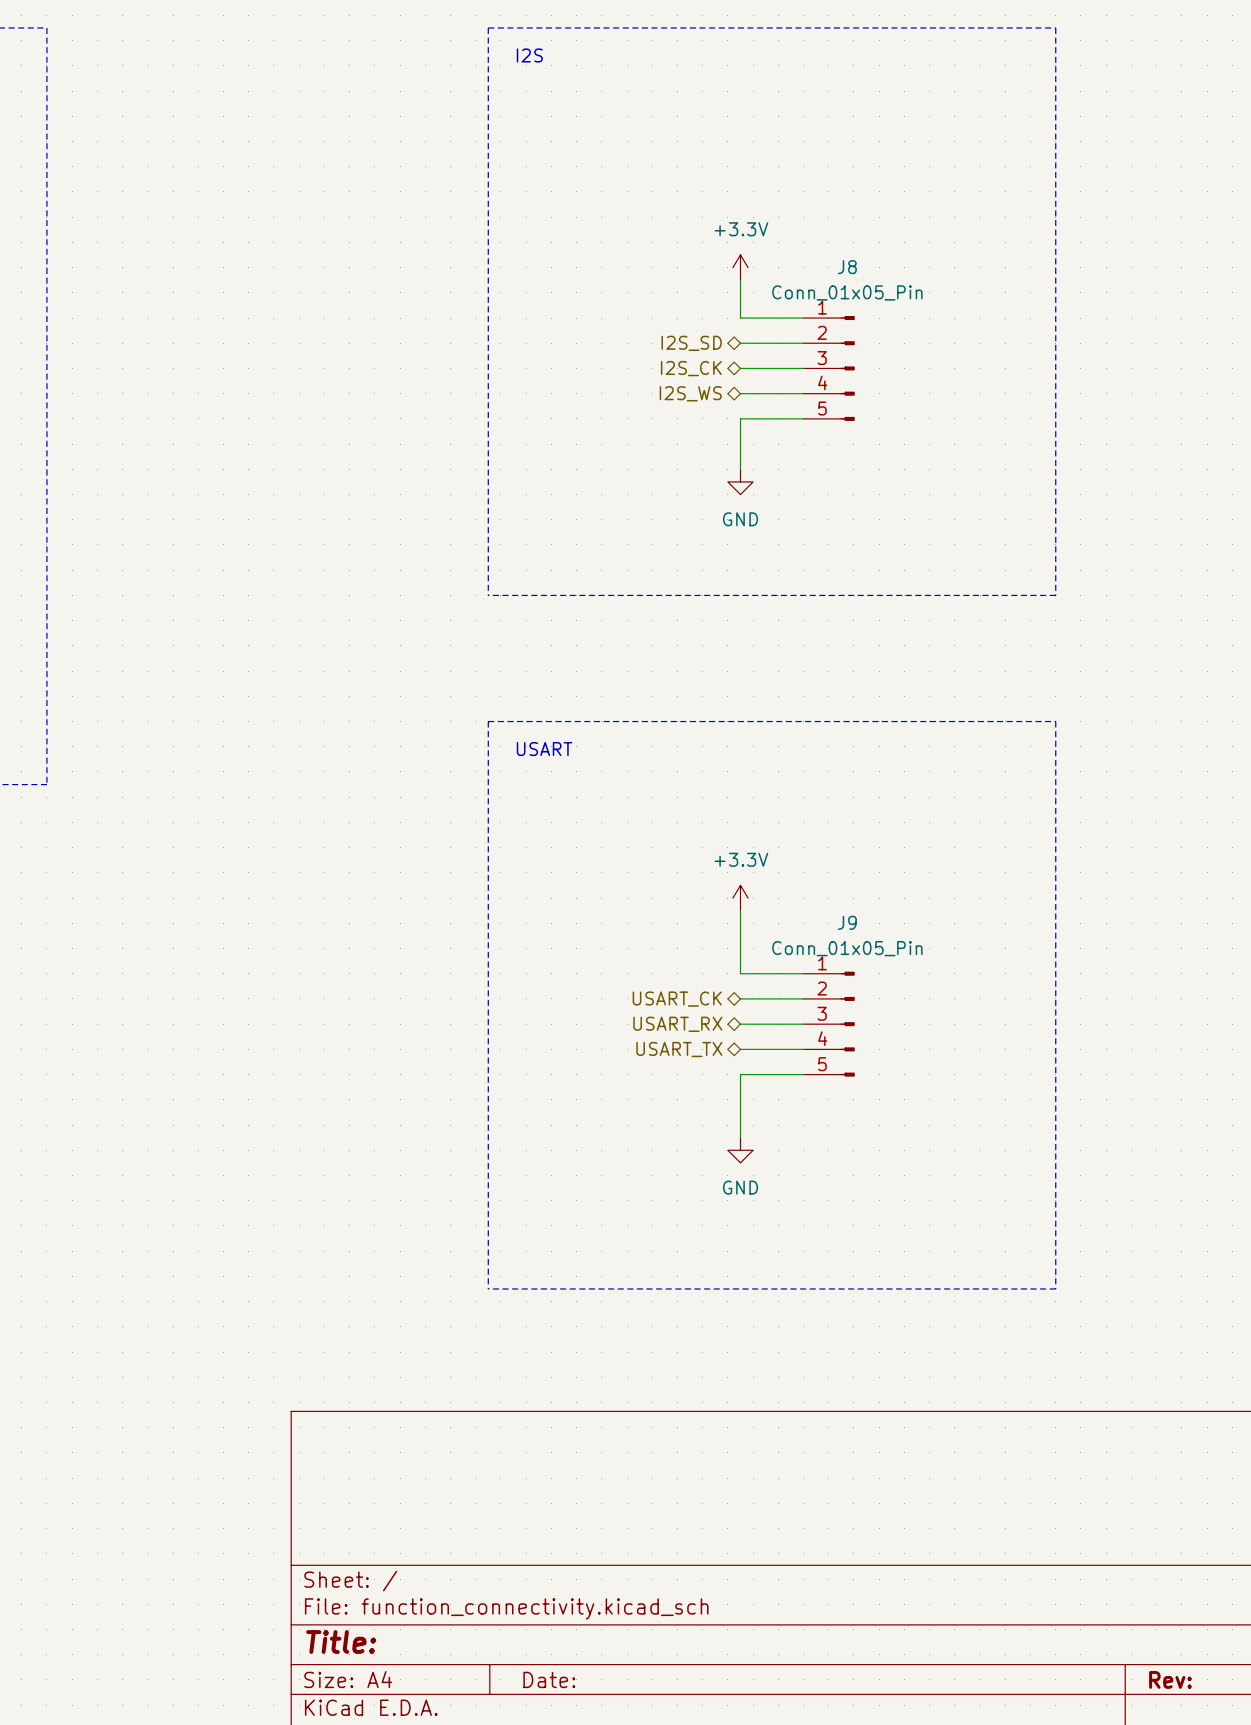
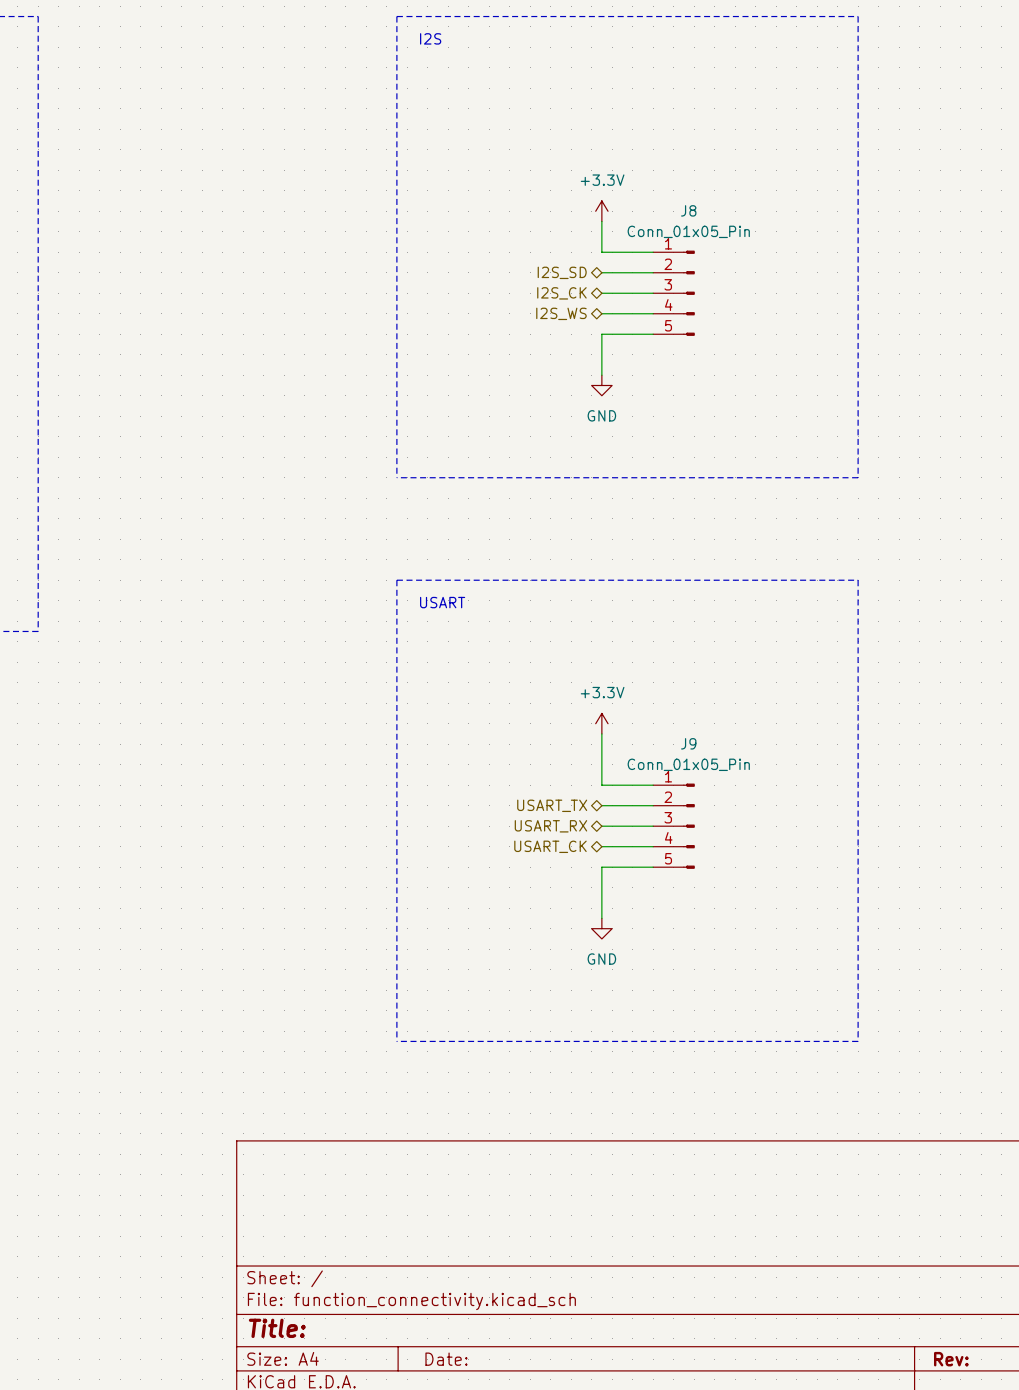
hierarchical label: USART_CK (677, 999) -> USART_TX (552, 805)
hierarchical label: USART_TX (679, 1049) -> USART_CK (550, 846)

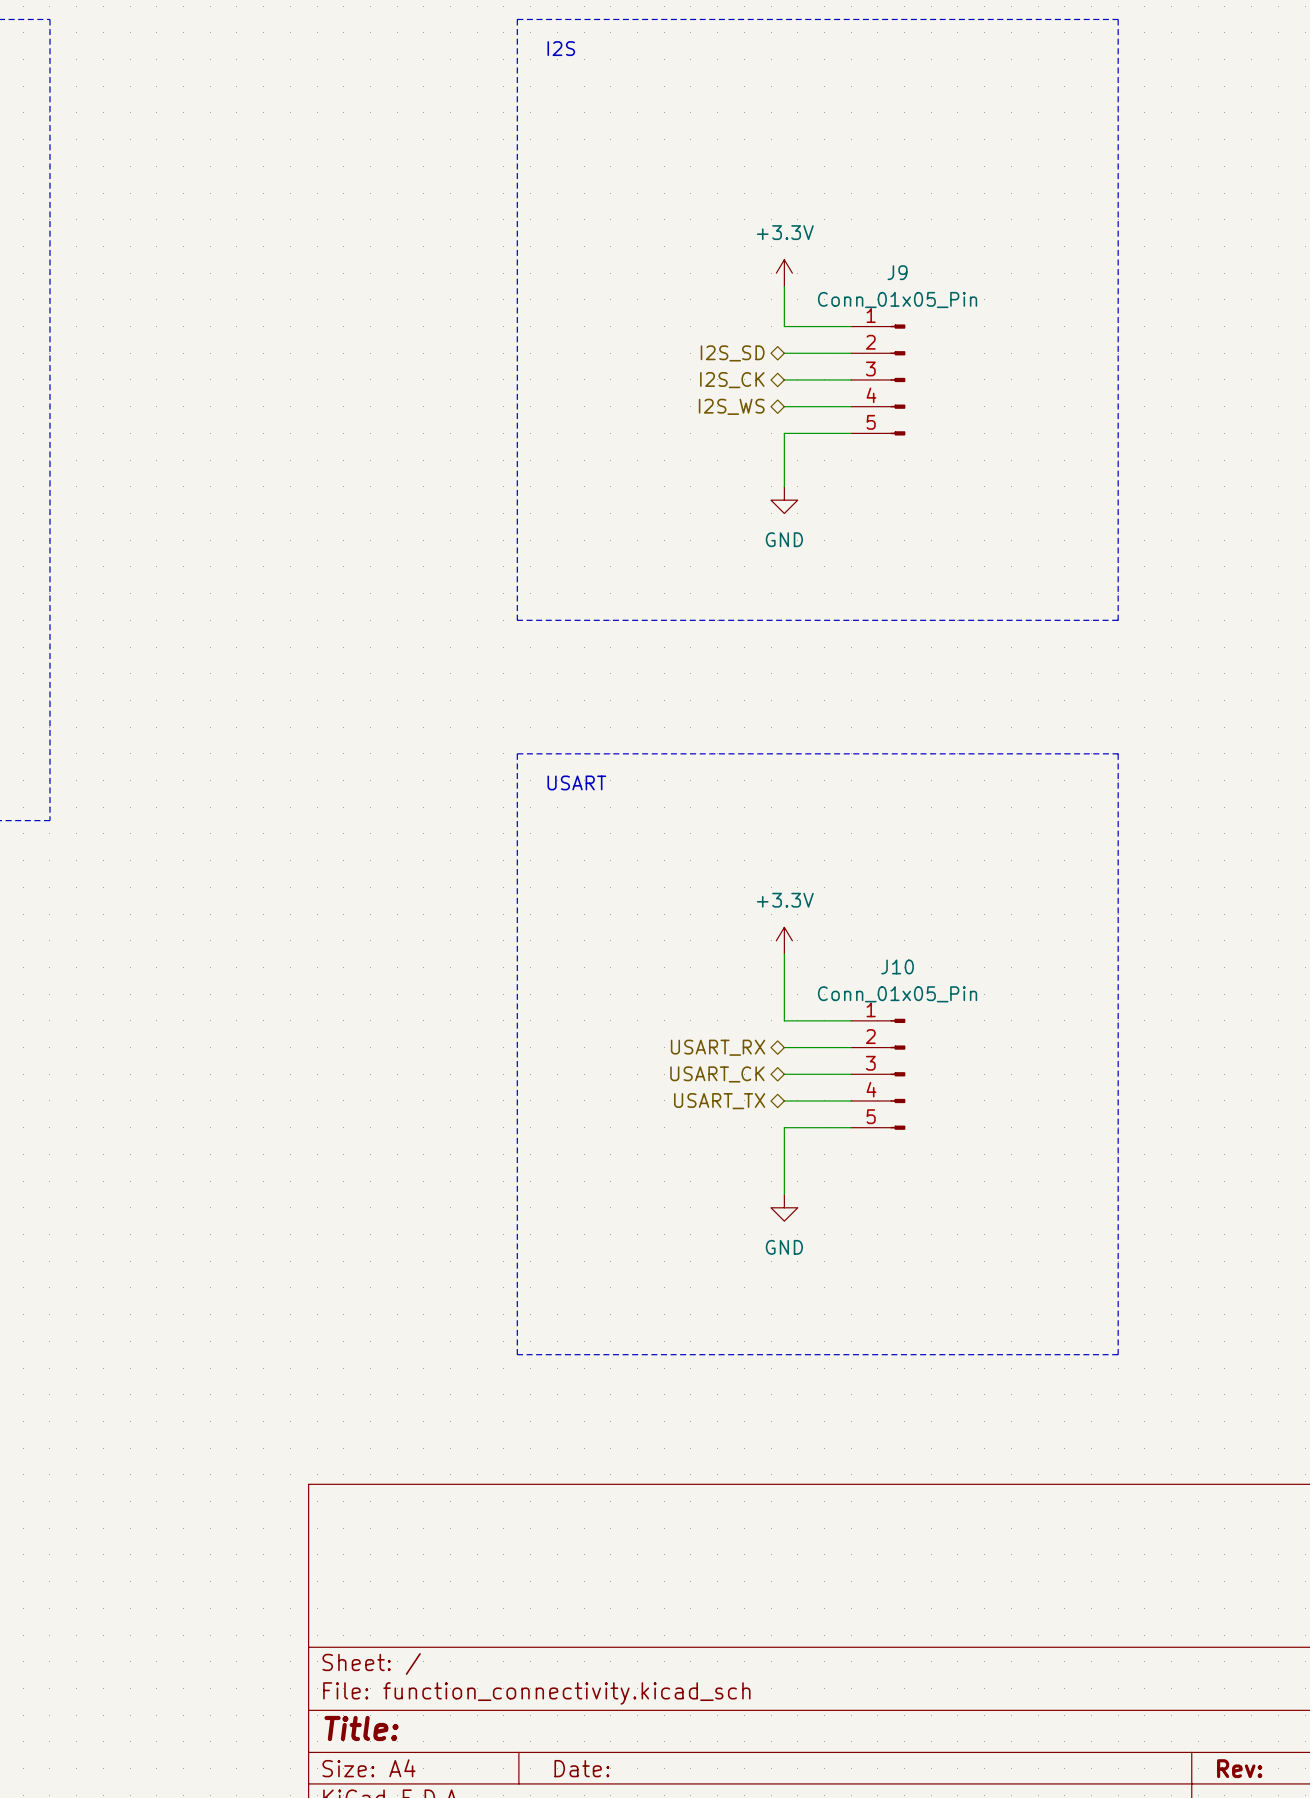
J8 name: J8 (688, 210) -> J9 (897, 272)
J9 name: J9 (688, 743) -> J10 (897, 966)
hierarchical label: USART_TX (552, 805) -> USART_RX (718, 1047)
hierarchical label: USART_RX (550, 826) -> USART_CK (717, 1074)
hierarchical label: USART_CK (550, 846) -> USART_TX (719, 1101)

